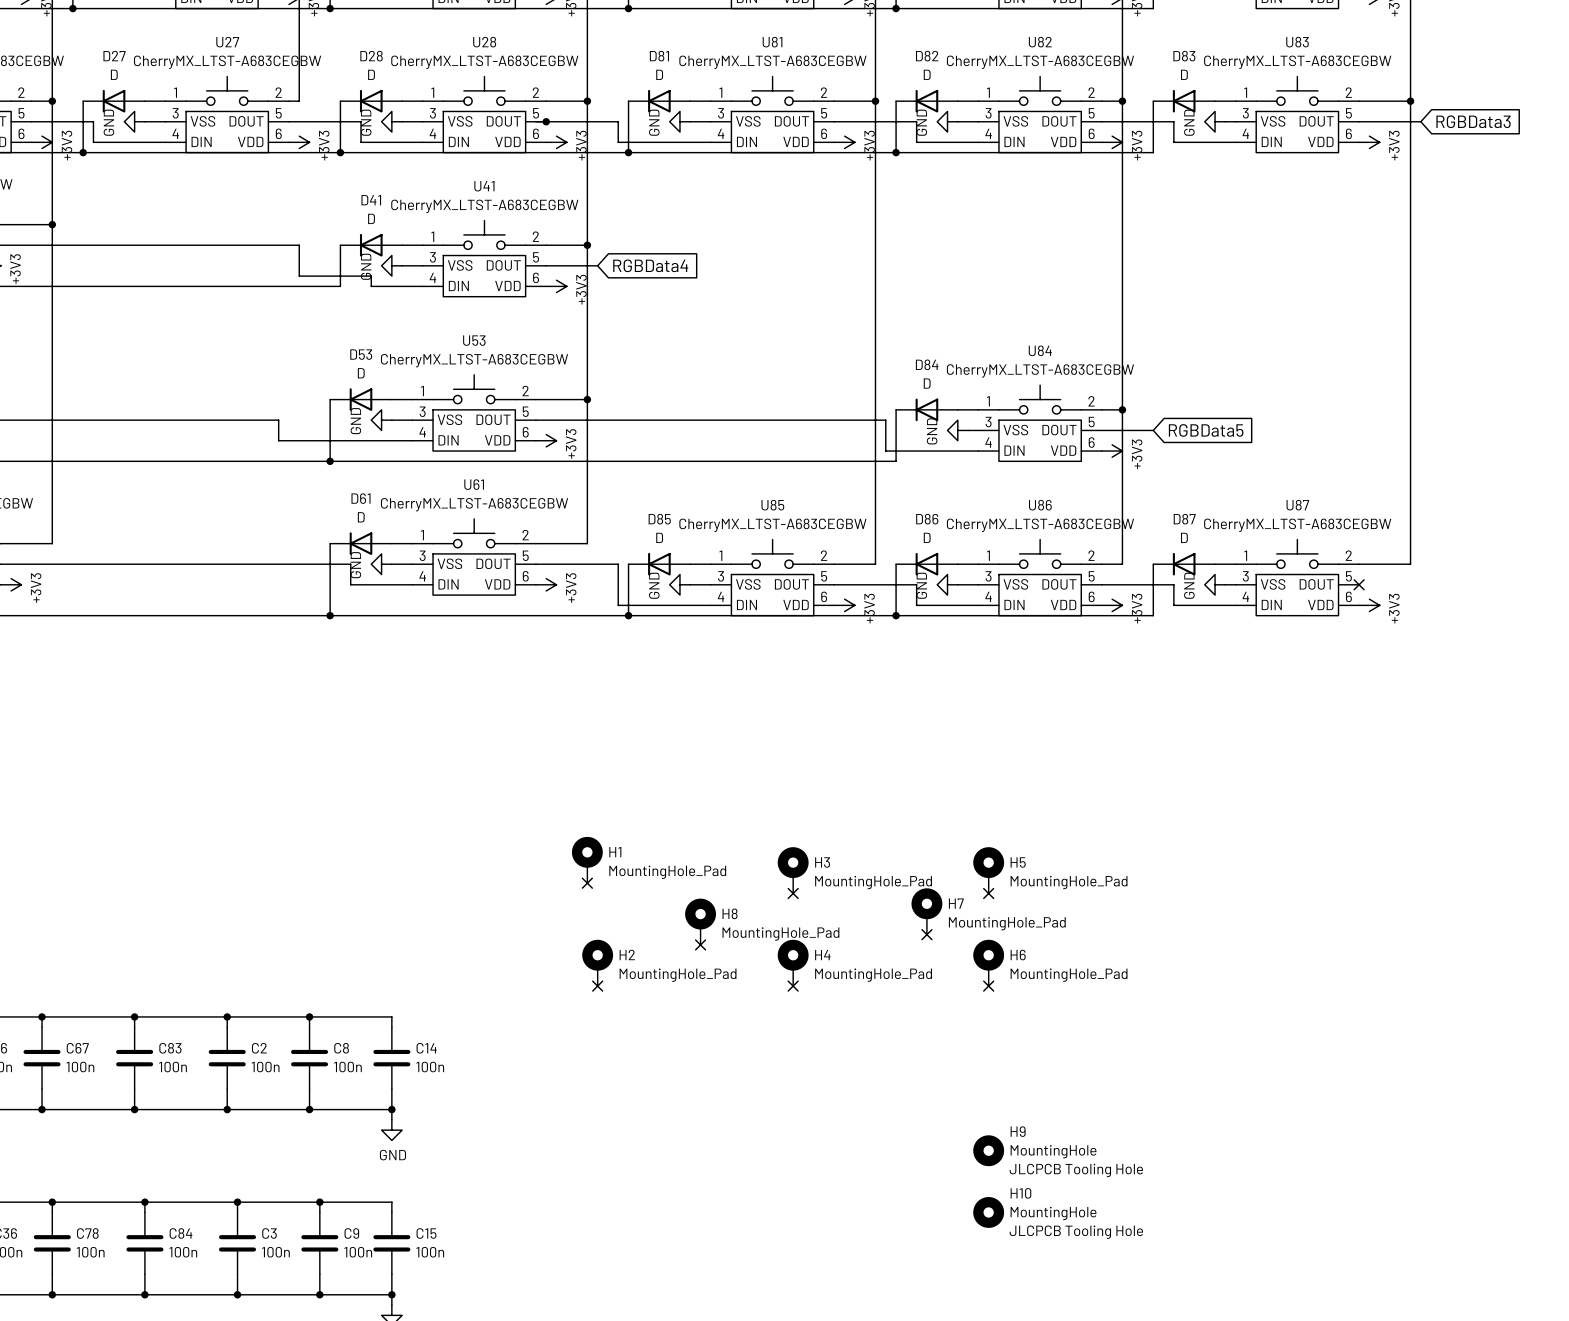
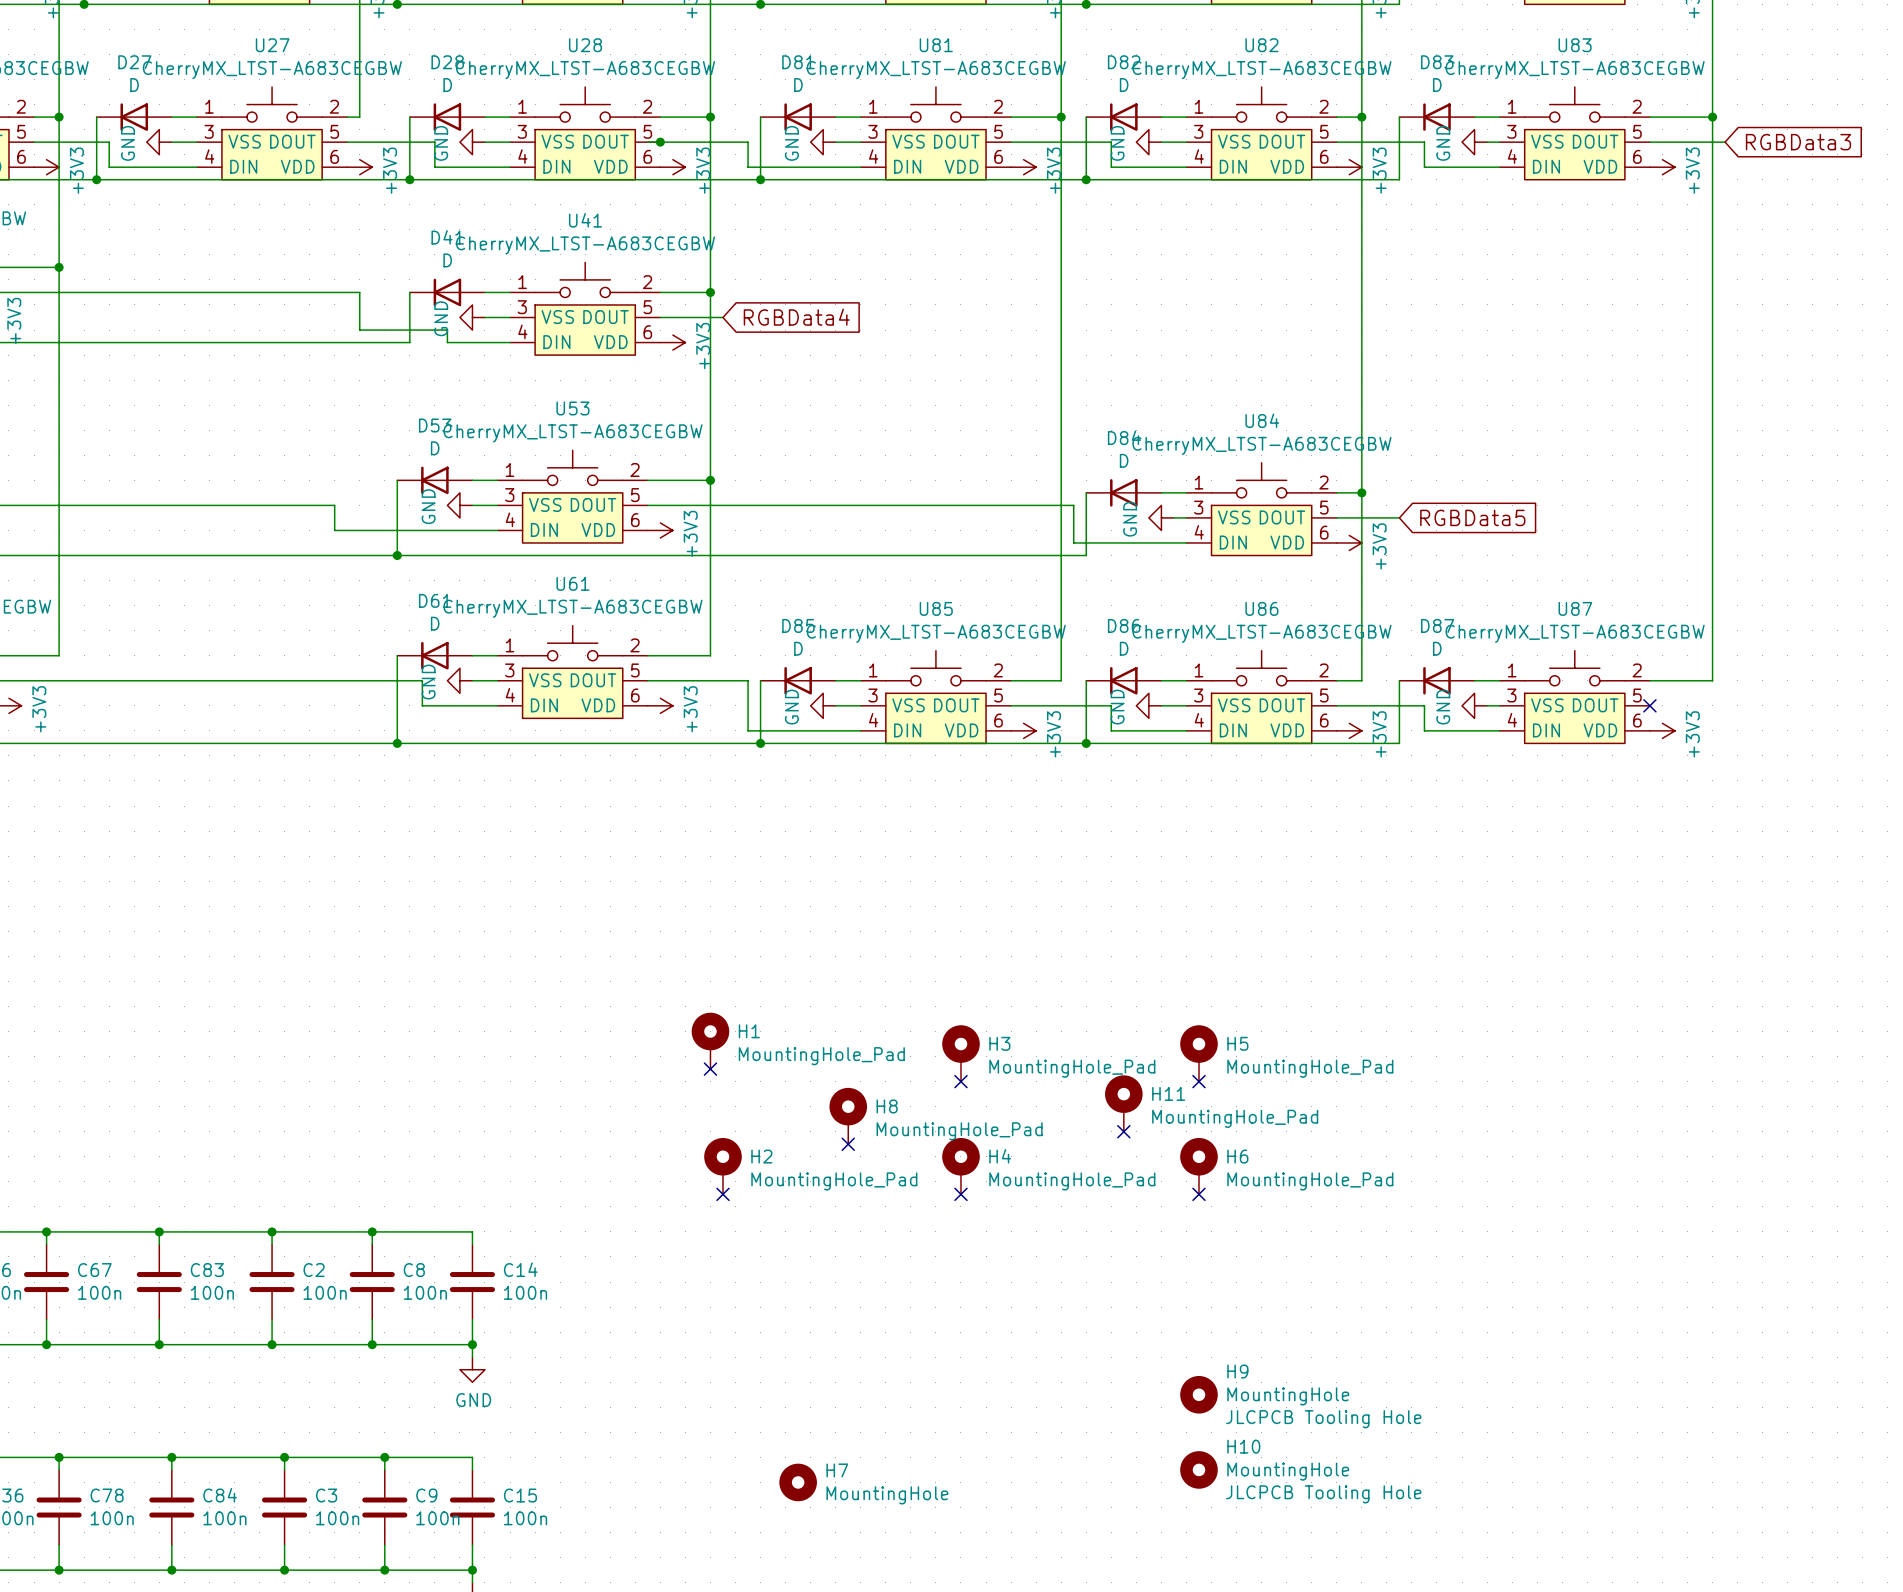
H7 name: H7 (956, 903) -> H11 (1168, 1093)
H7: none -> MountingHole (798, 1482)

